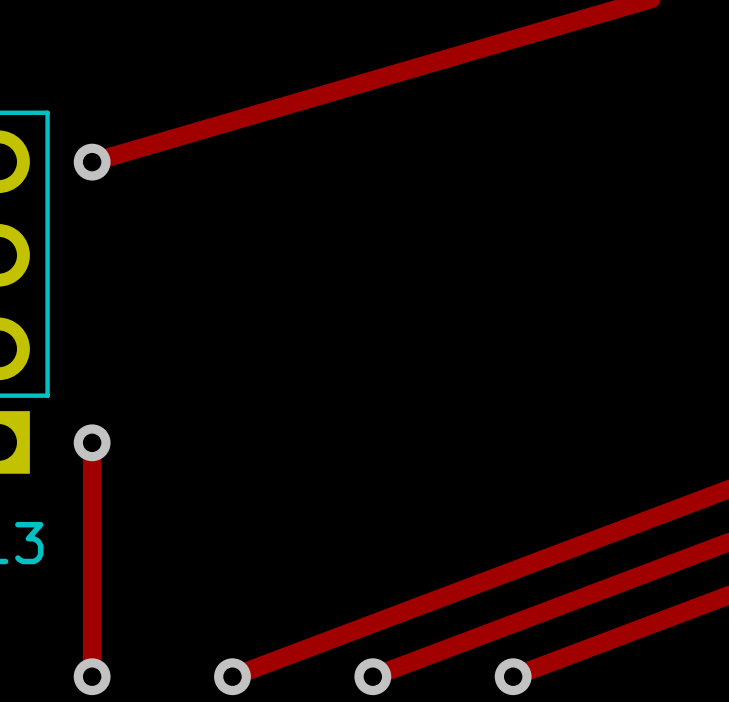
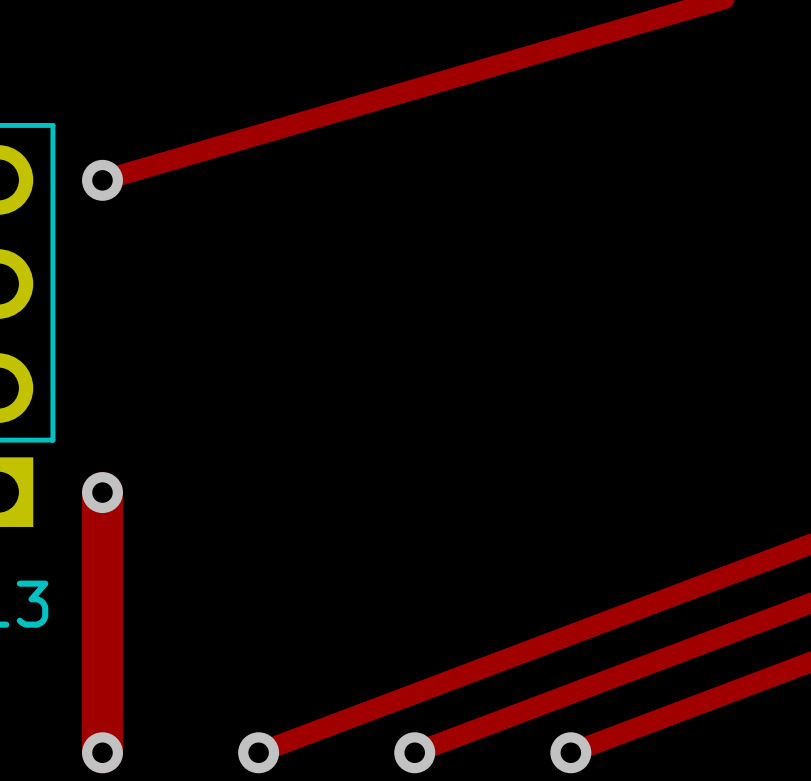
track width: thin (92, 442) (92, 676) -> thick (102, 492) (102, 752)

